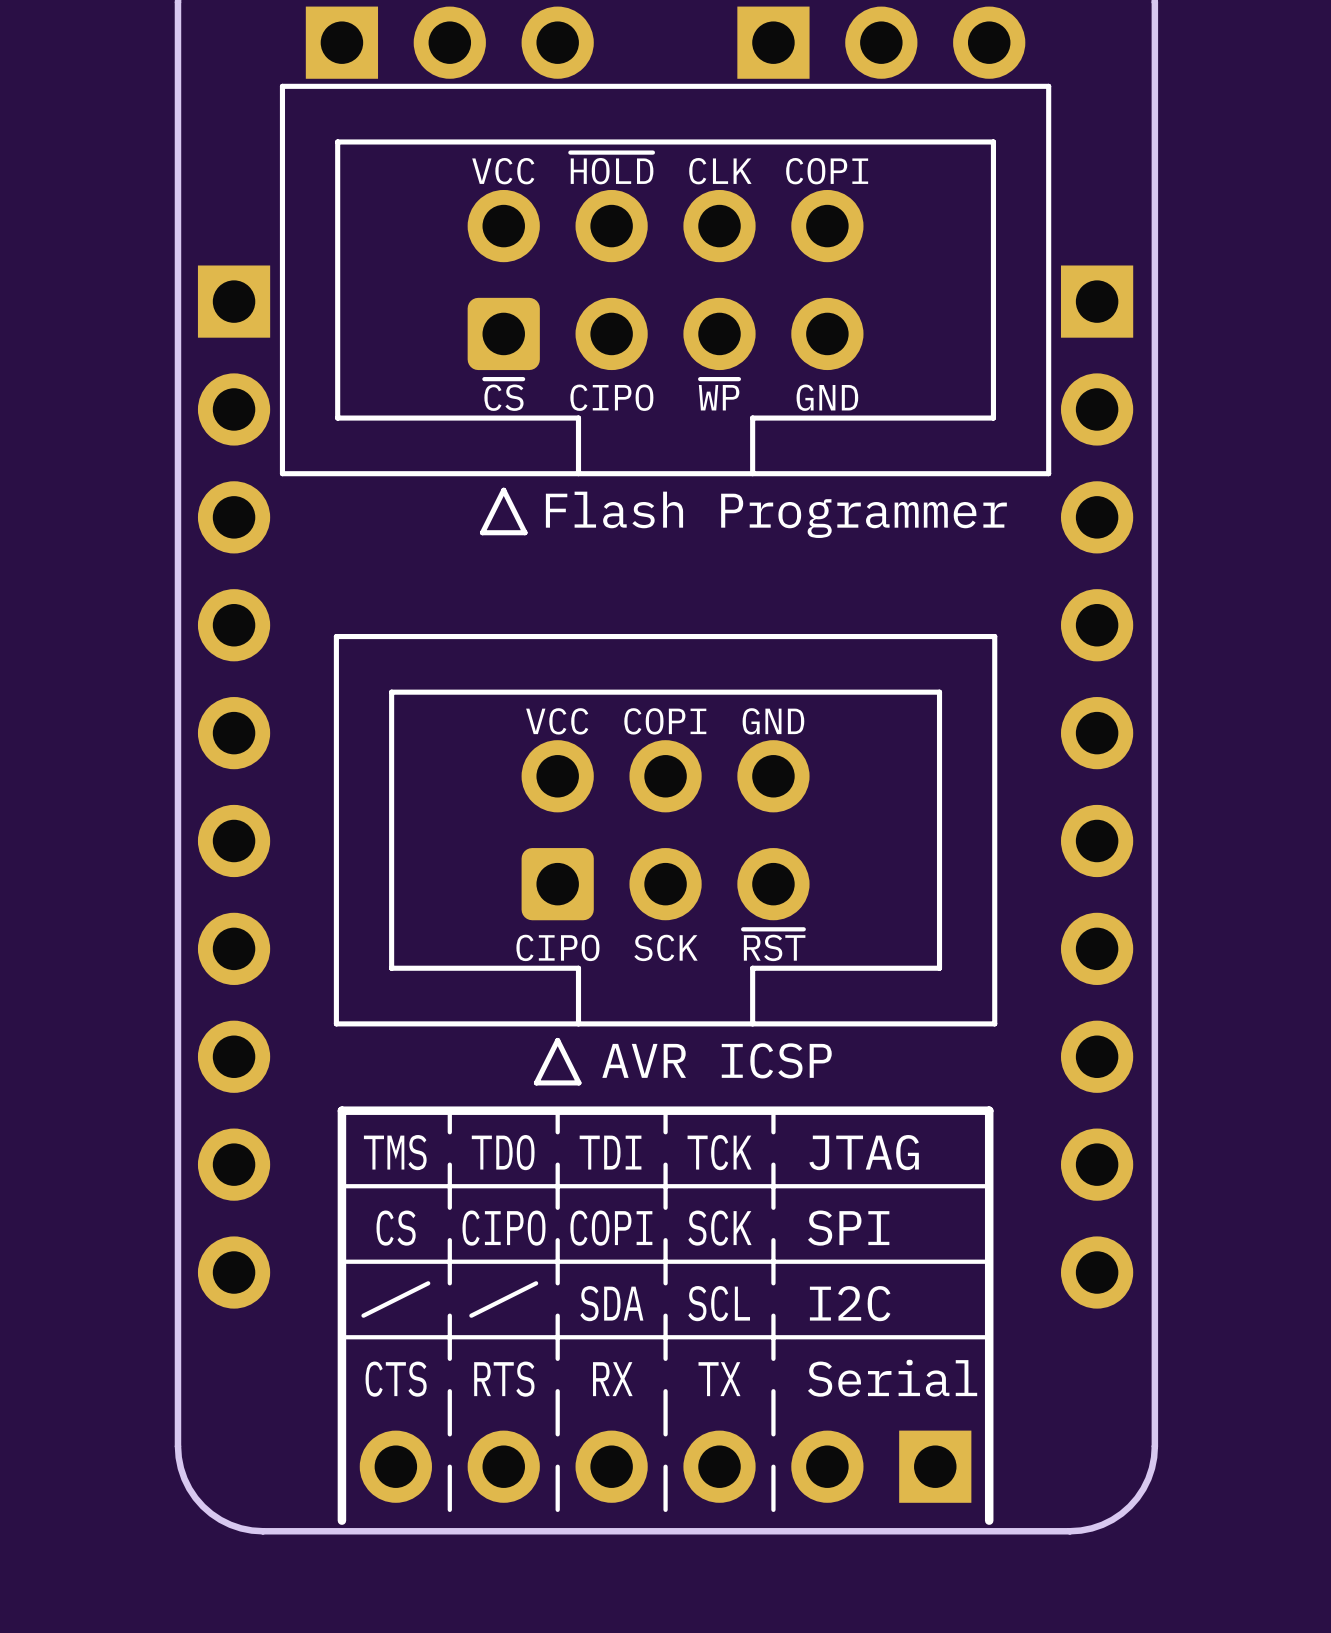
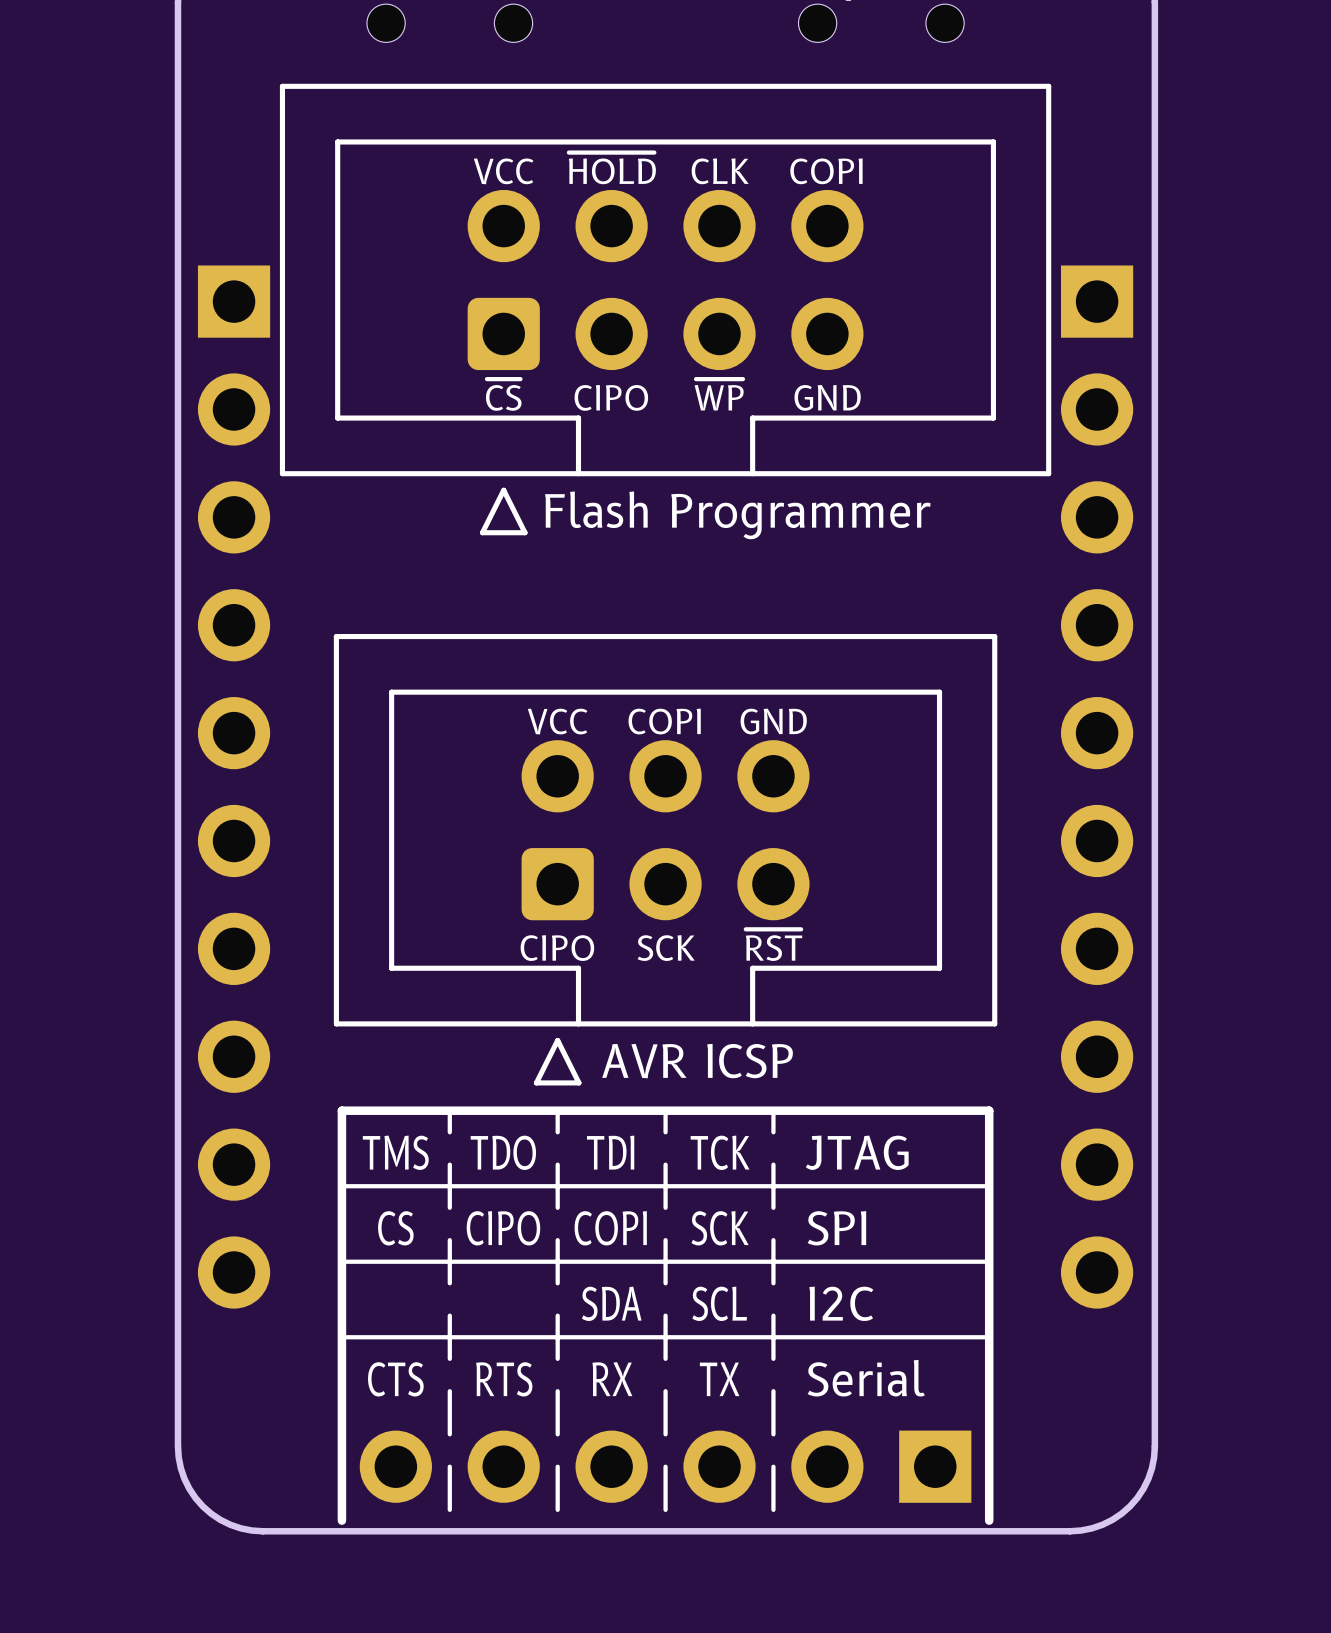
part footprint: [305, 6, 594, 79] -> [366, 4, 533, 43]
part footprint: [737, 6, 1026, 79] -> [798, 4, 965, 43]
line: (428, 1283) (363, 1315) -> none
line: (536, 1283) (471, 1315) -> none

